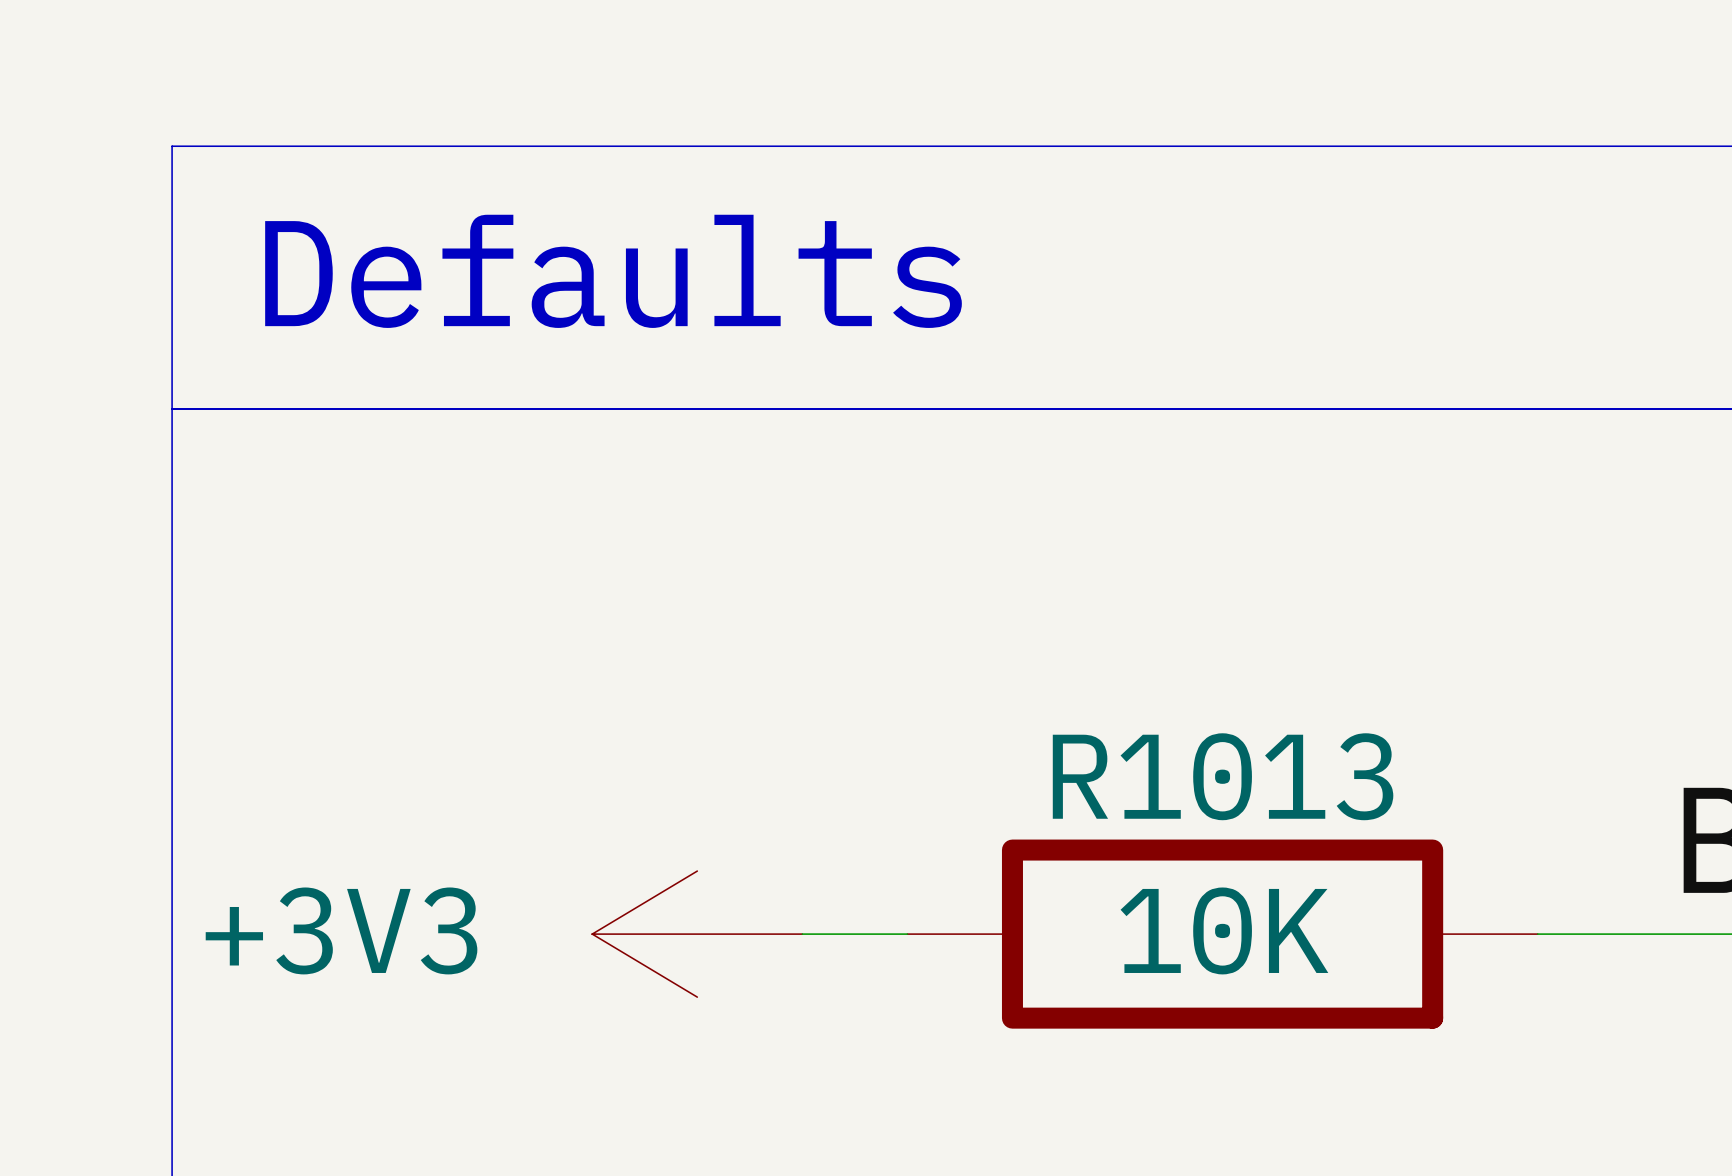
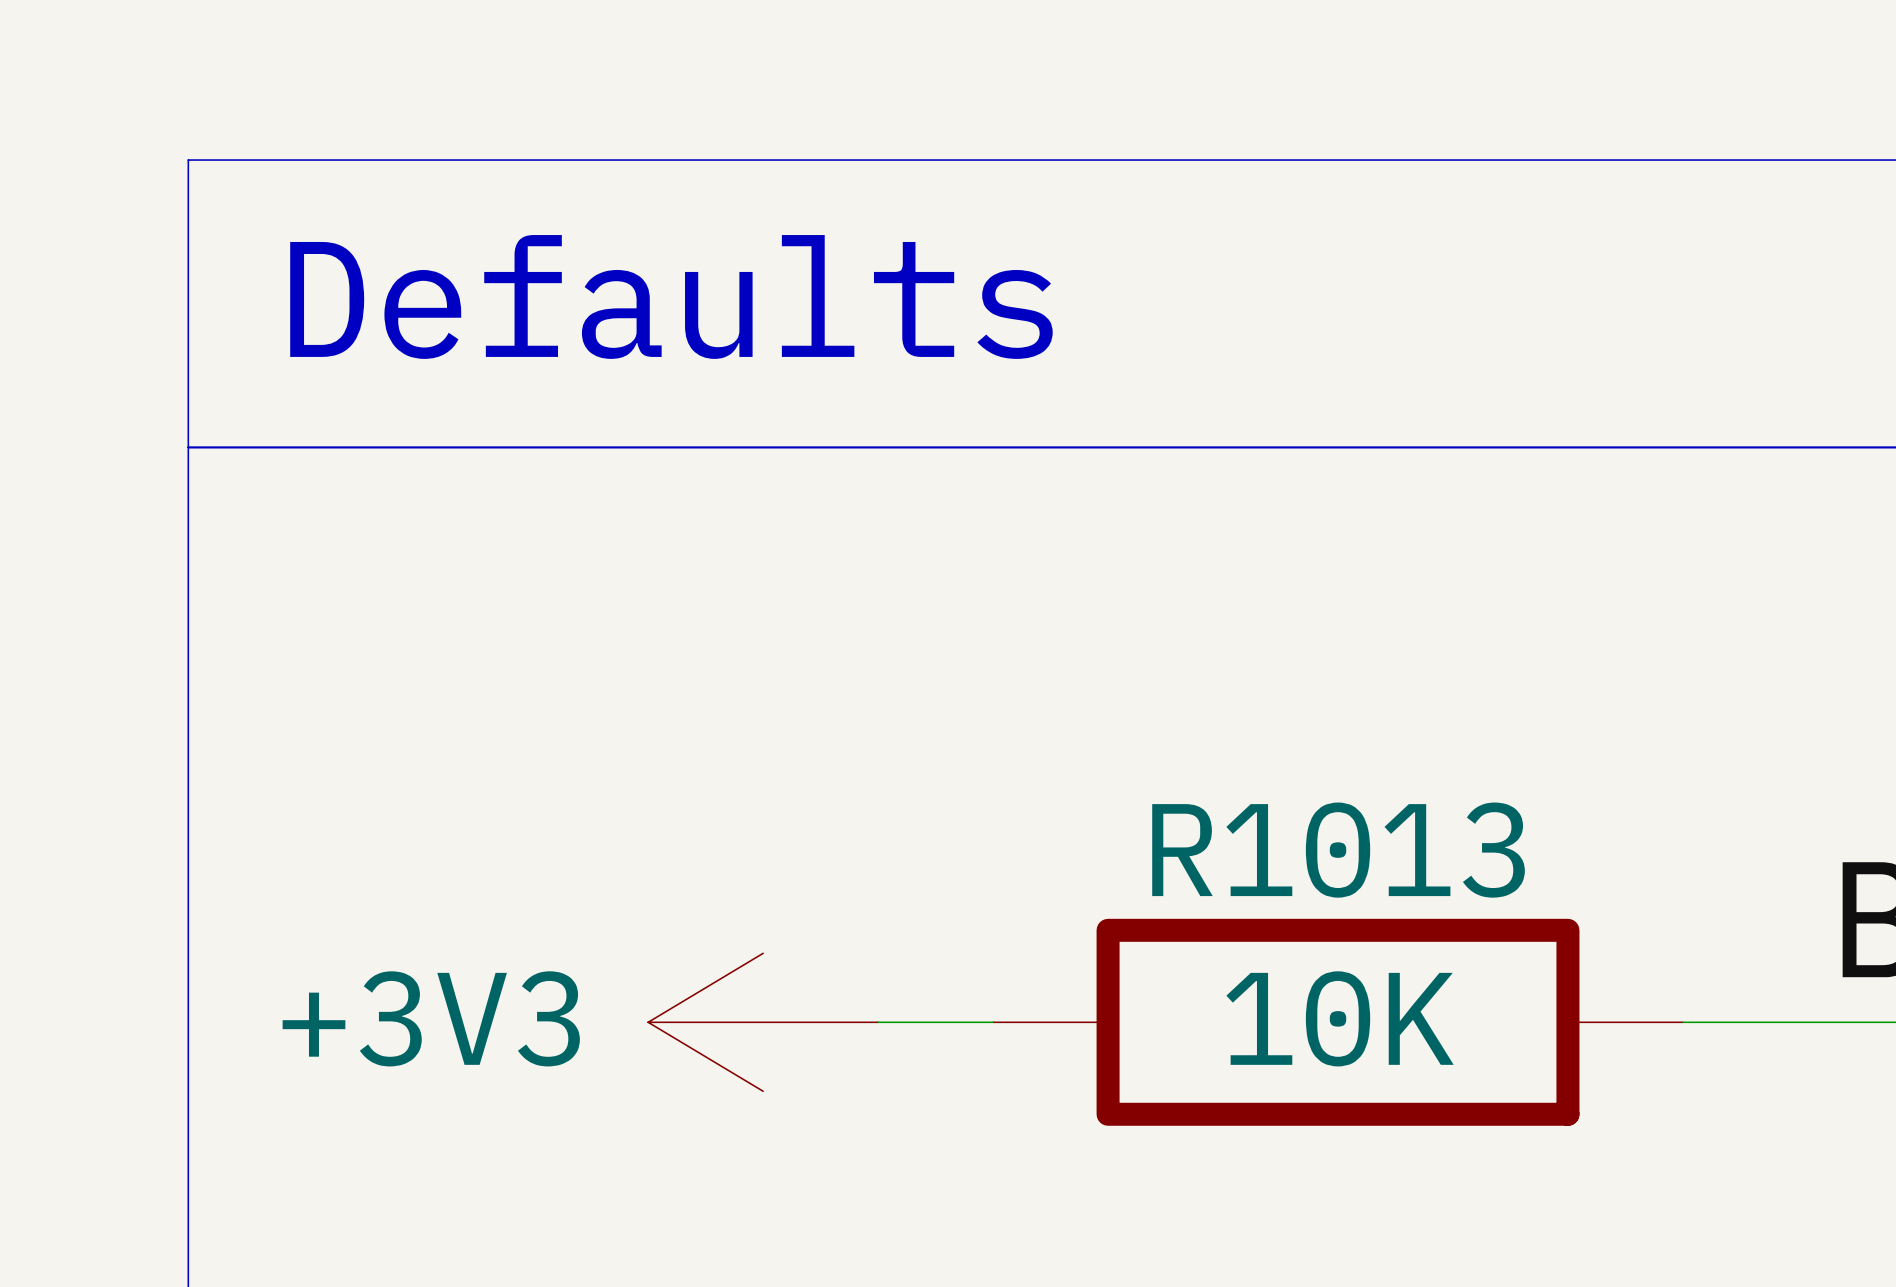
power symbol text position: +3V3 (341, 930) -> +3V3 (431, 1018)

